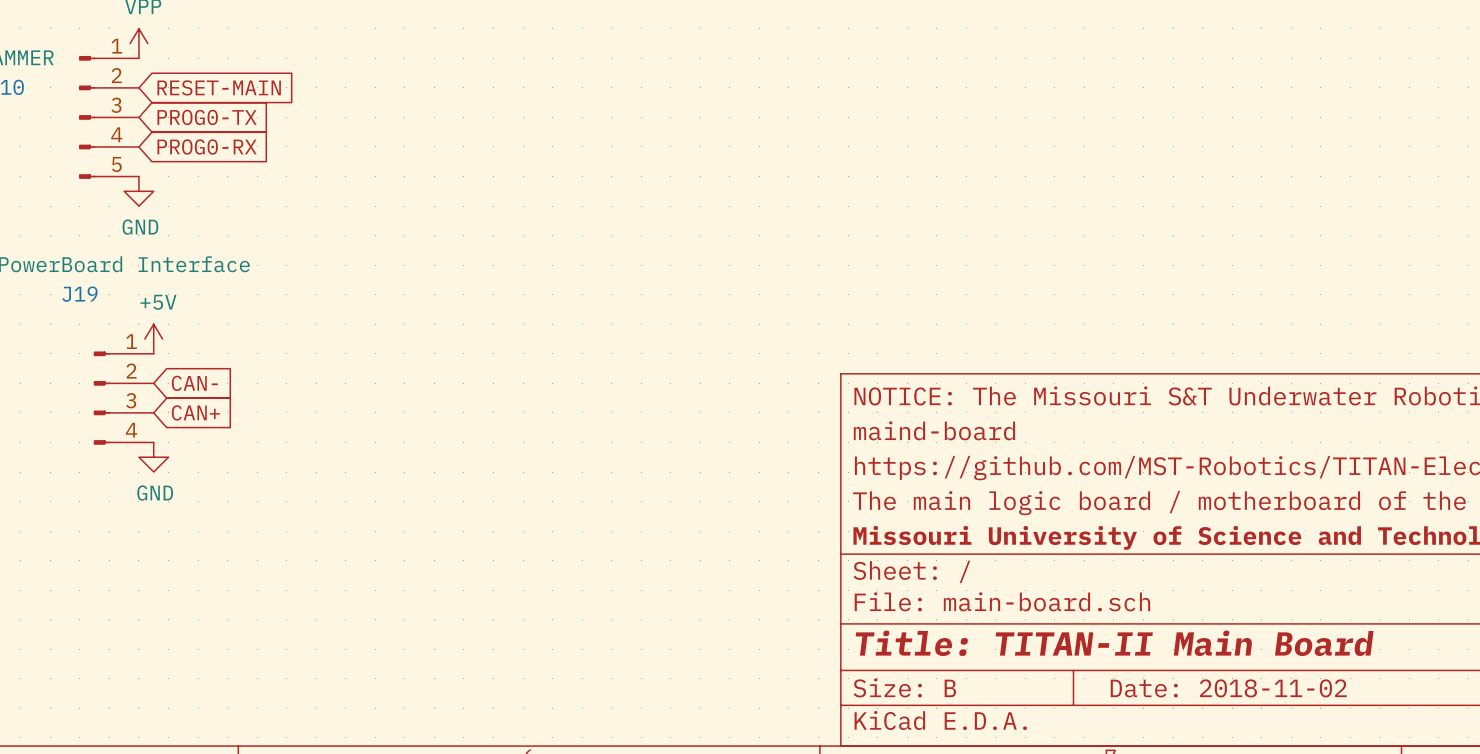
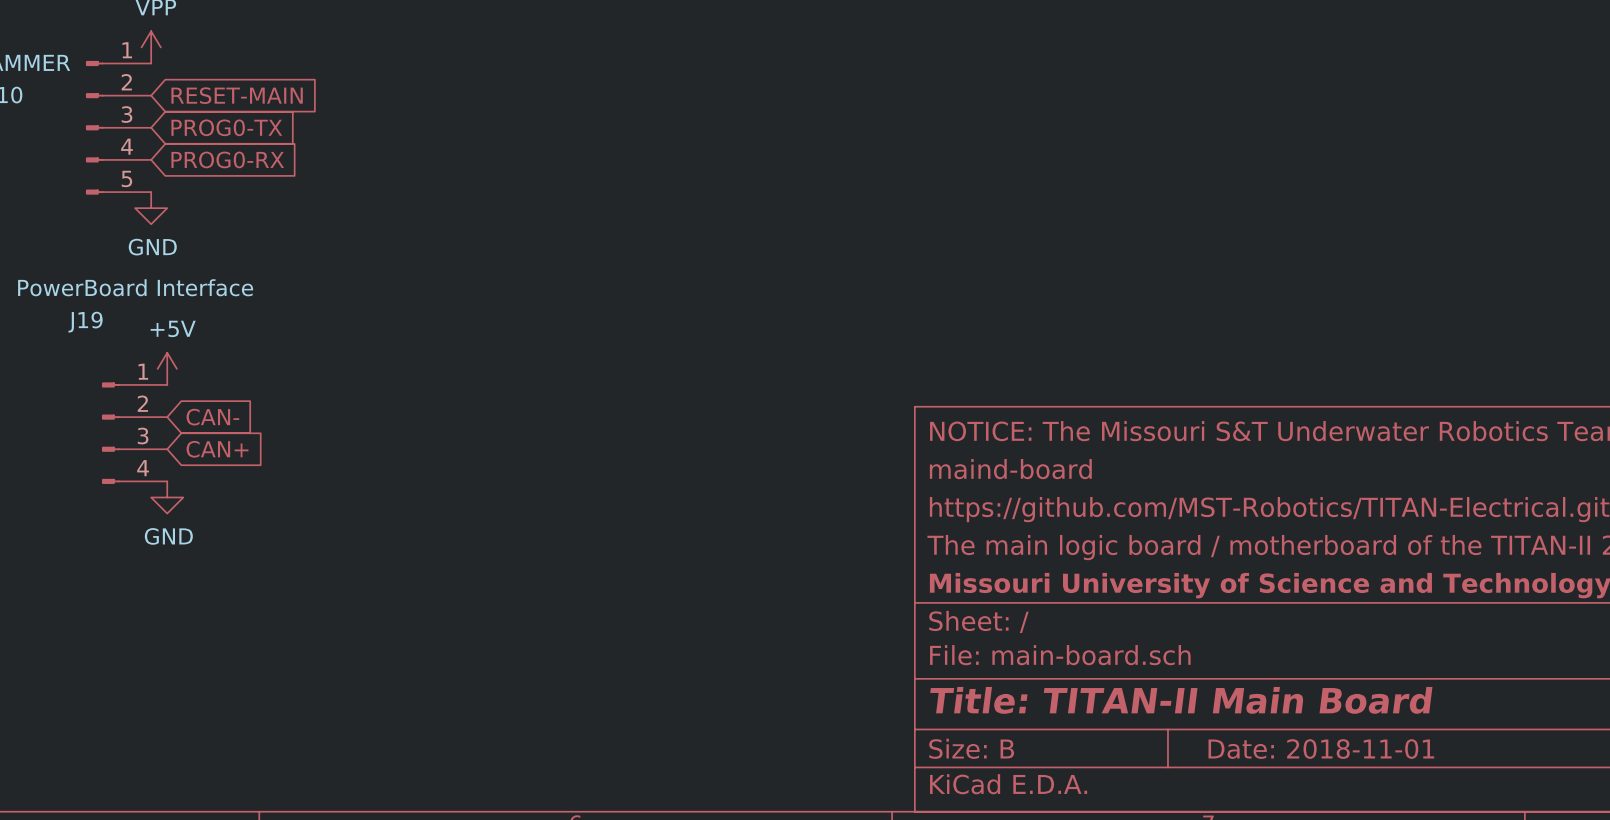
title block: Date: 2018-11-02 (1228, 688) -> Date: 2018-11-01 (1321, 749)

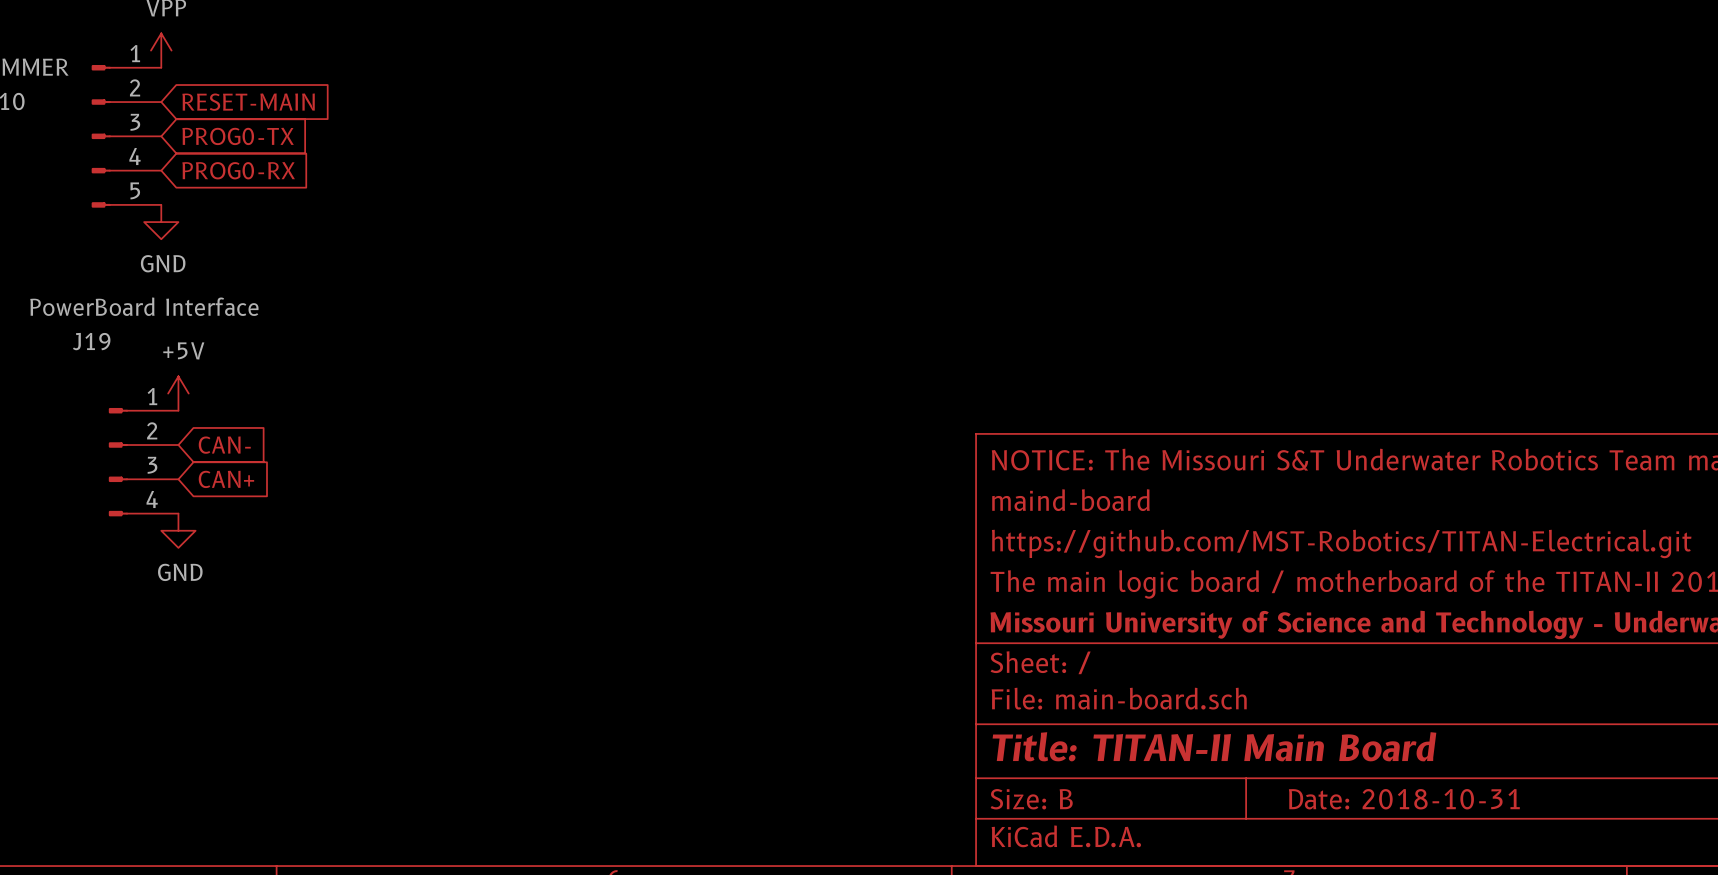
title block: Date: 2018-11-01 (1321, 749) -> Date: 2018-10-31 (1404, 799)

